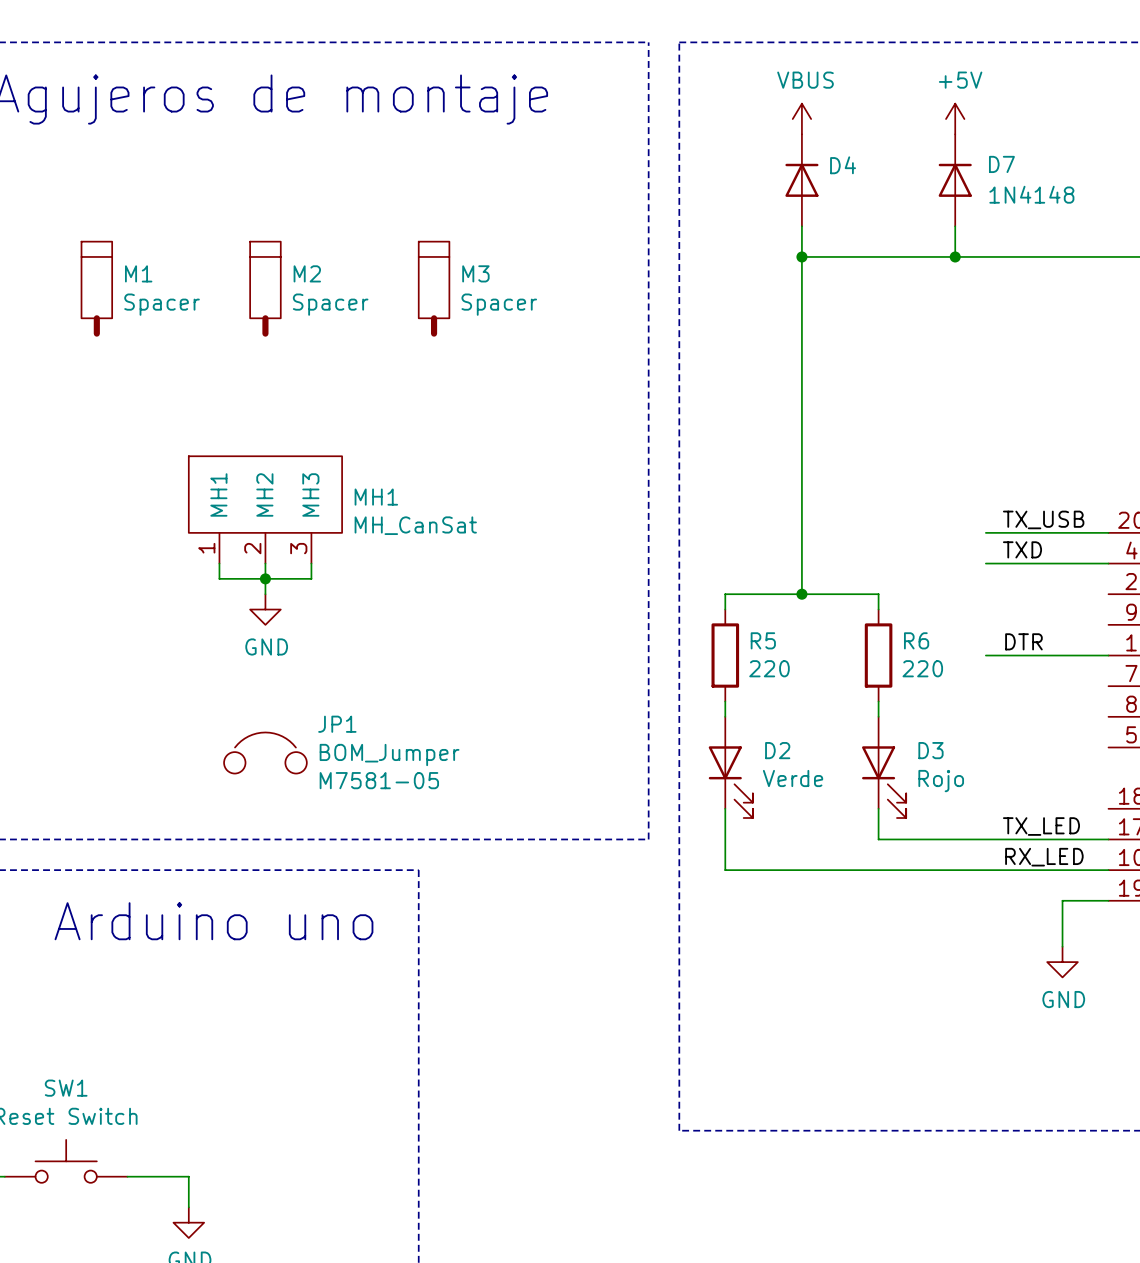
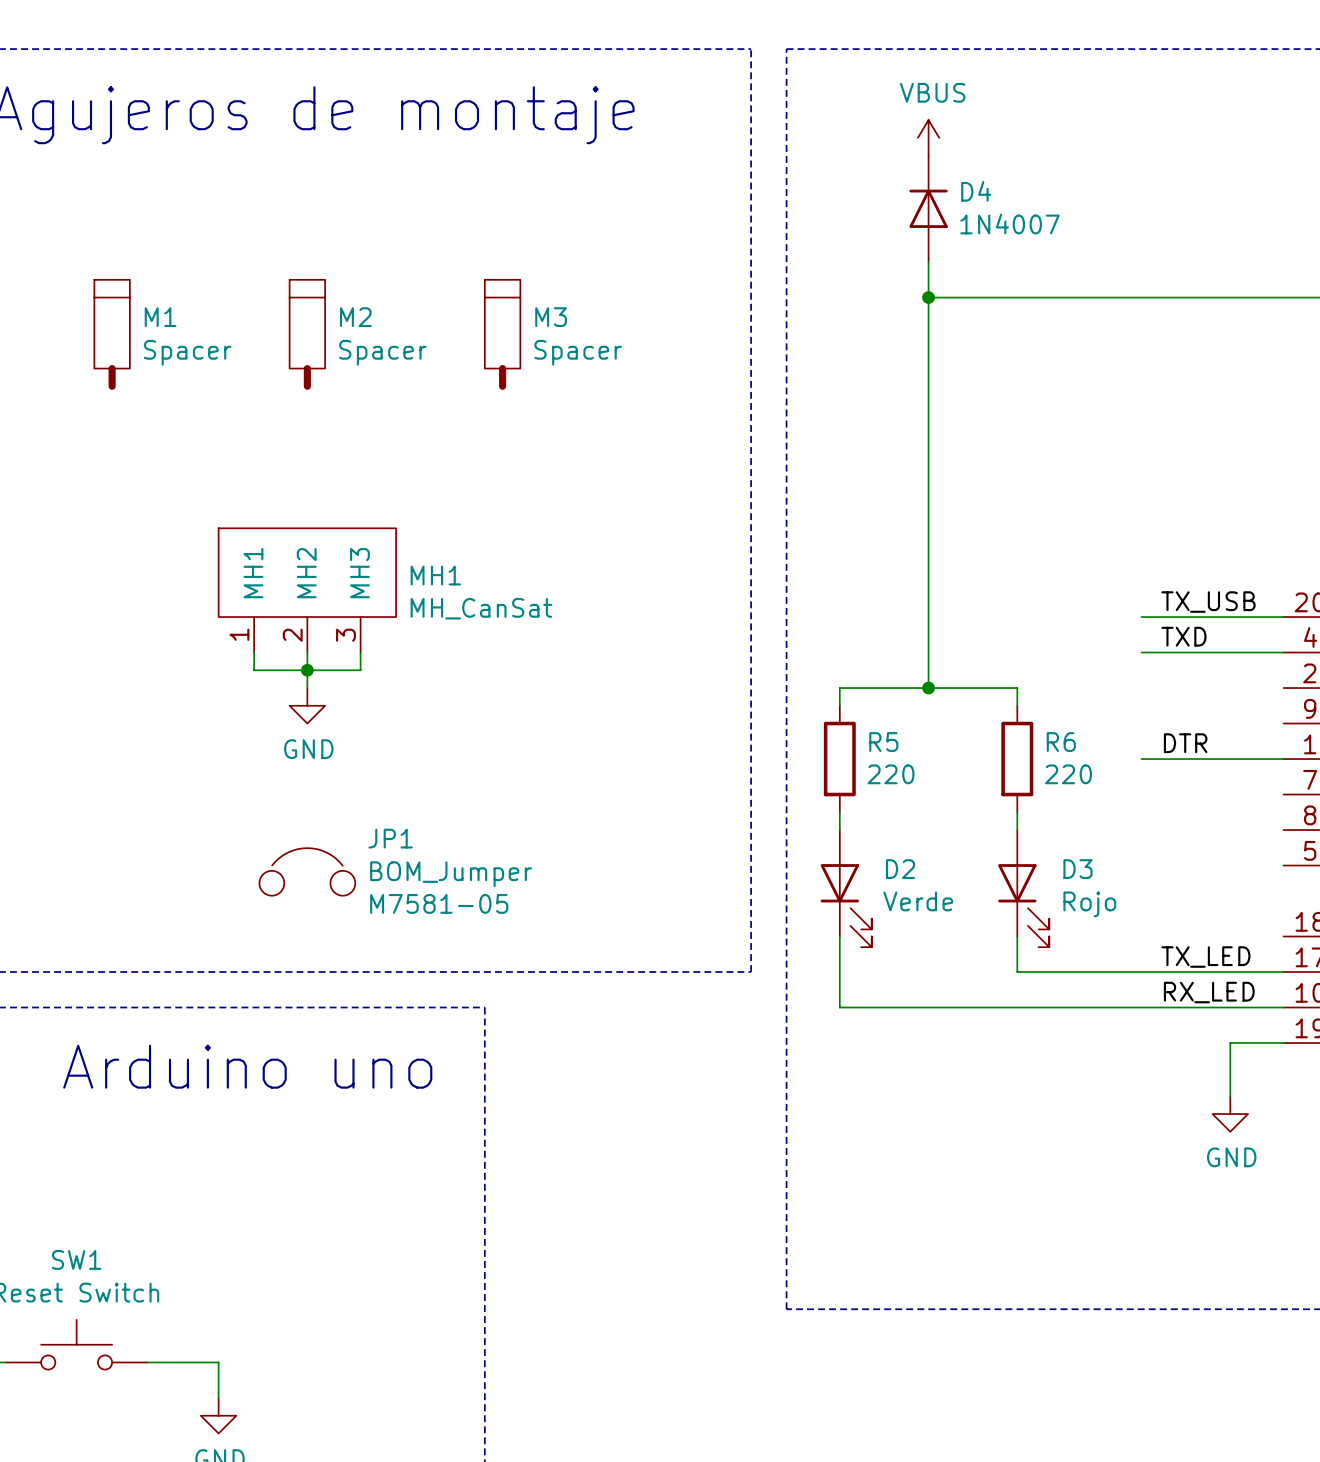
power symbol: +5V (955, 119) -> none
D7: 1N4148 (955, 180) -> none
D4 value: none -> 1N4007 (1009, 224)
wire: (955, 226) (955, 256) -> none
junction: (955, 256) -> none

